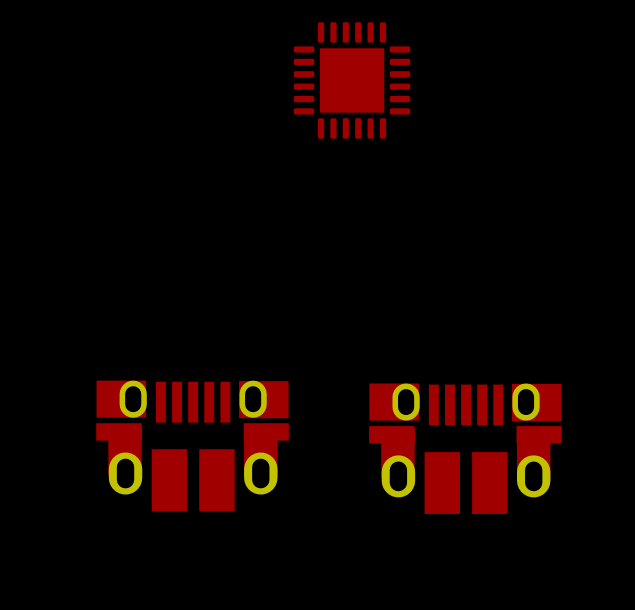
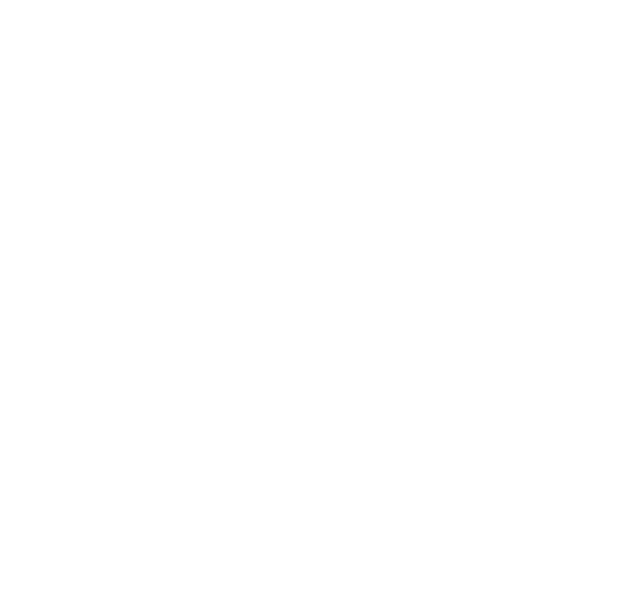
part: (352, 80) -> none
part: (192, 445) -> none
part: (465, 448) -> none

